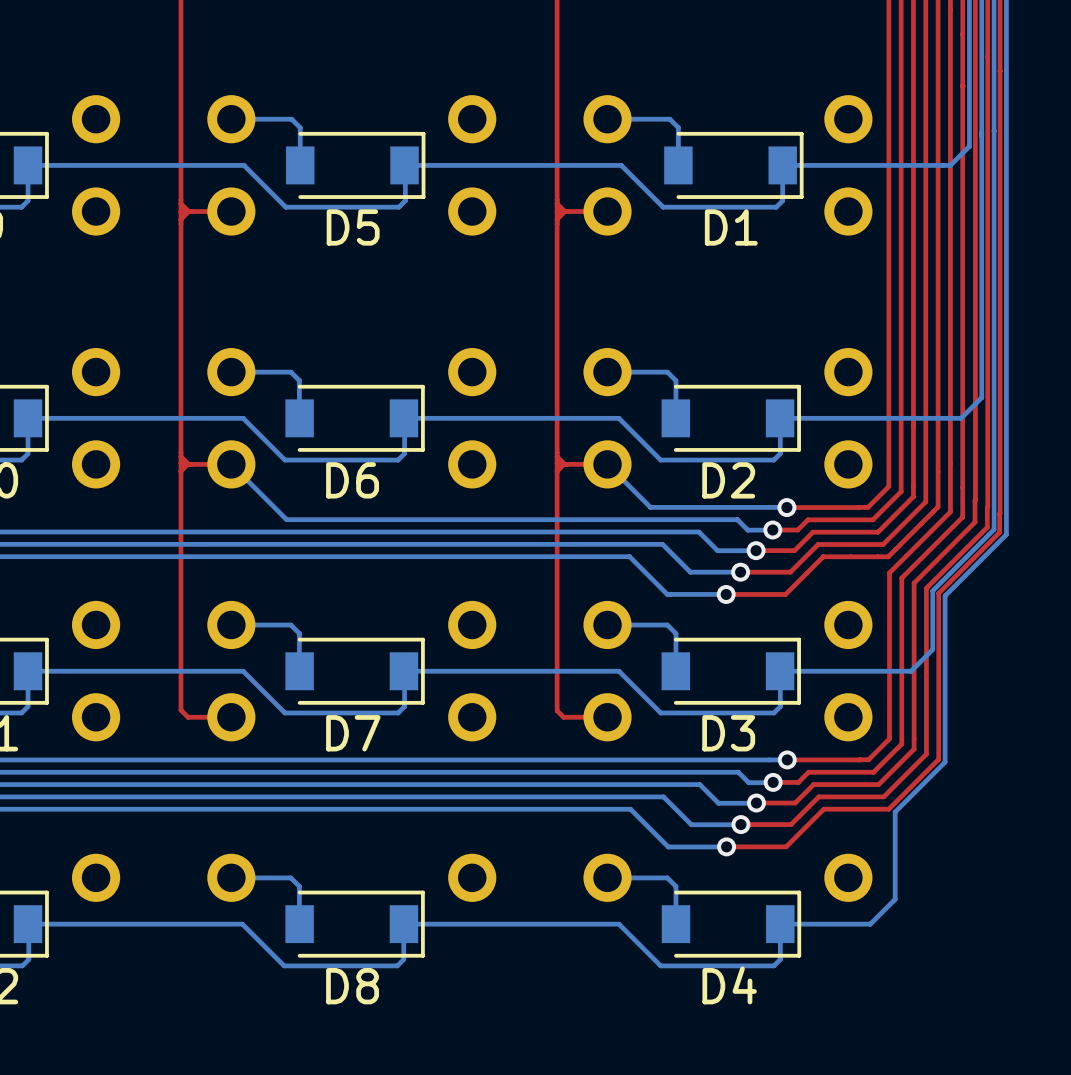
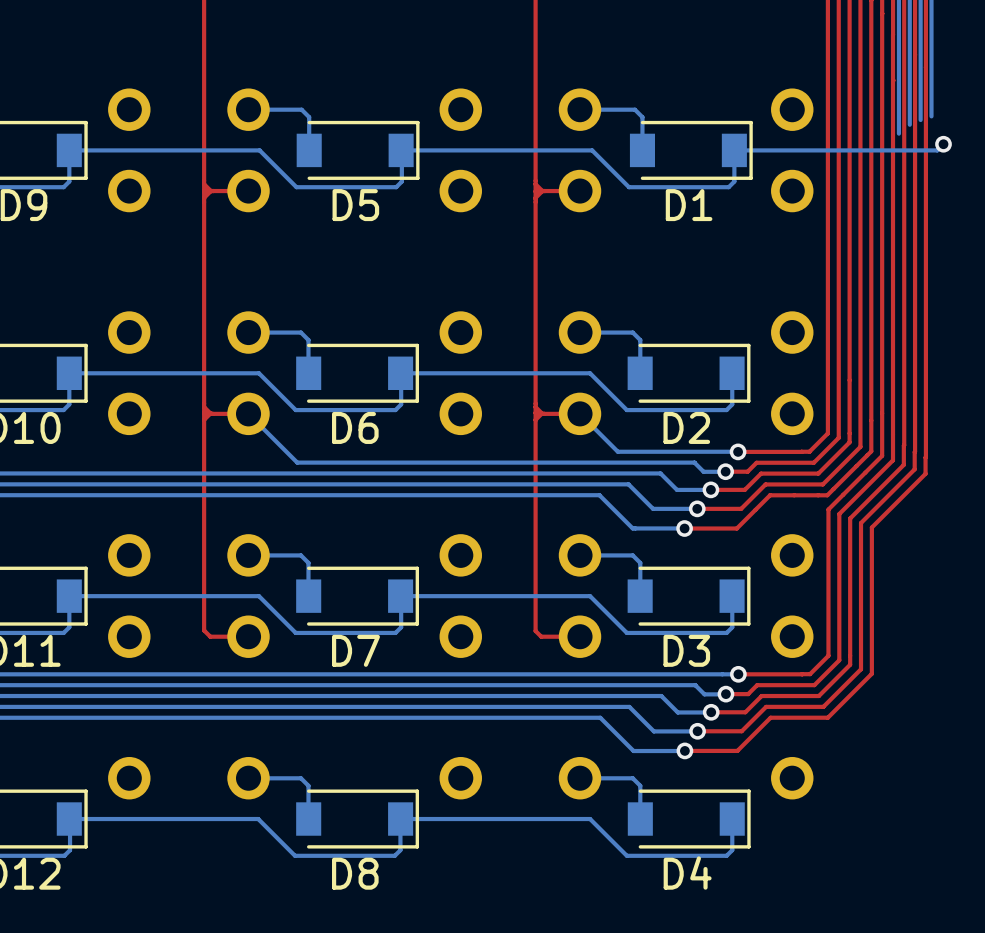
bottom track: (1006, 126) (1006, 534) (945, 595) (945, 762) (895, 812) (895, 899) (870, 924) -> none
bottom track: (994, 130) (994, 529) (932, 590) (932, 649) (911, 671) (780, 671) -> none
bottom track: (981, 136) (981, 397) (961, 418) (780, 418) -> none
bottom track: (969, 146) (950, 165) -> (943, 144) (937, 150) (882, 150)
via: none -> (943, 144)
bottom track: (870, 924) (780, 924) -> none

